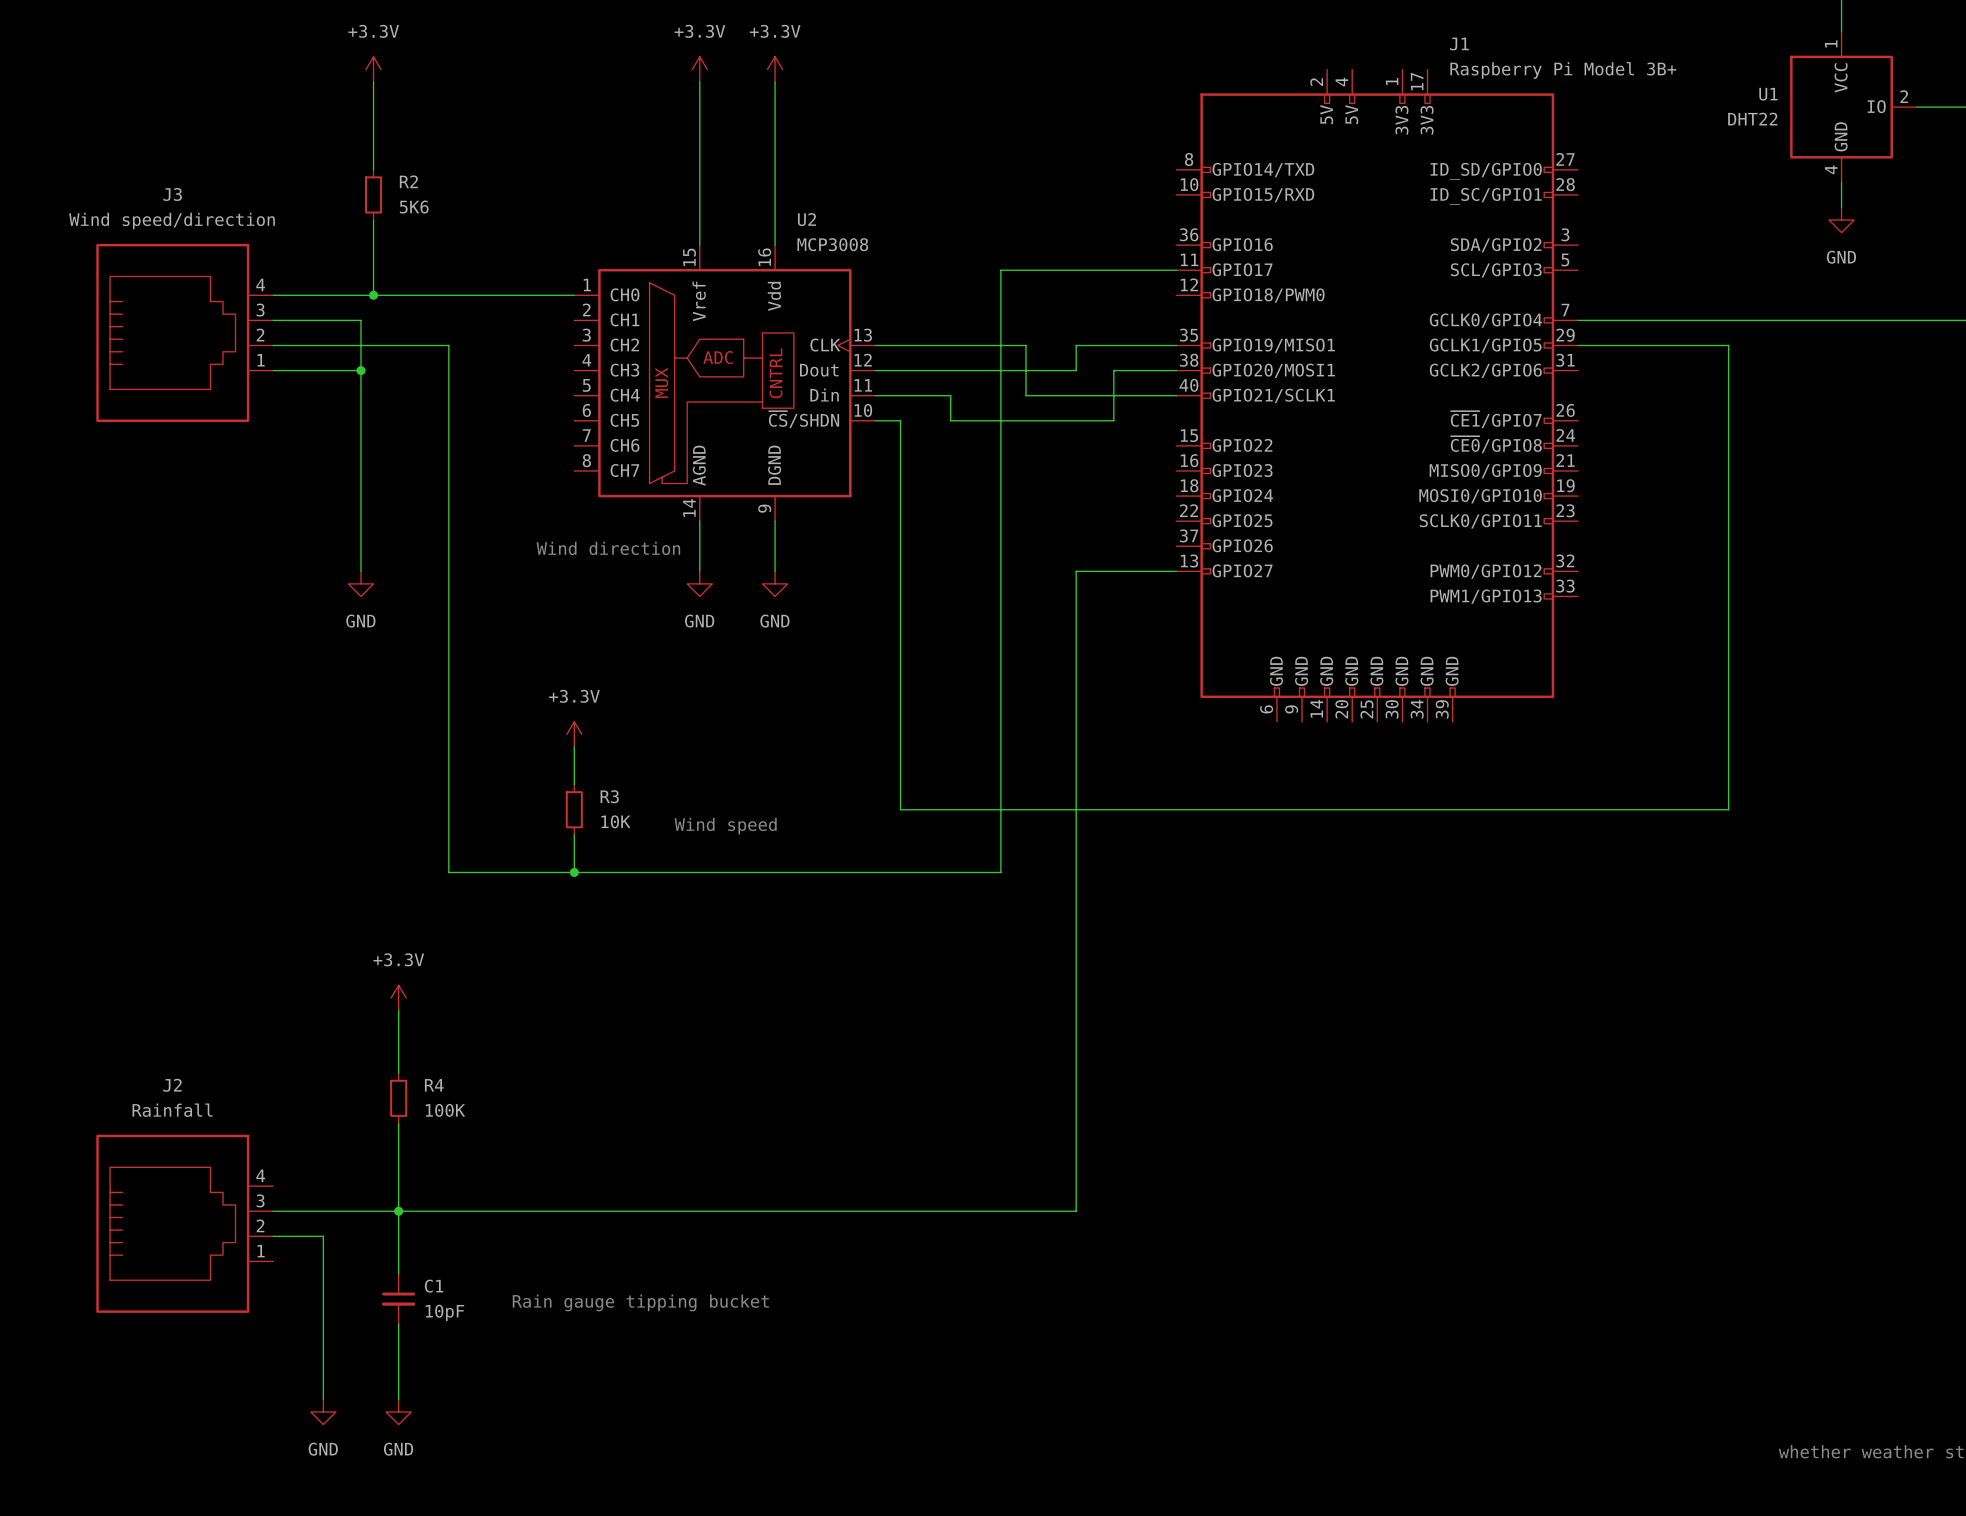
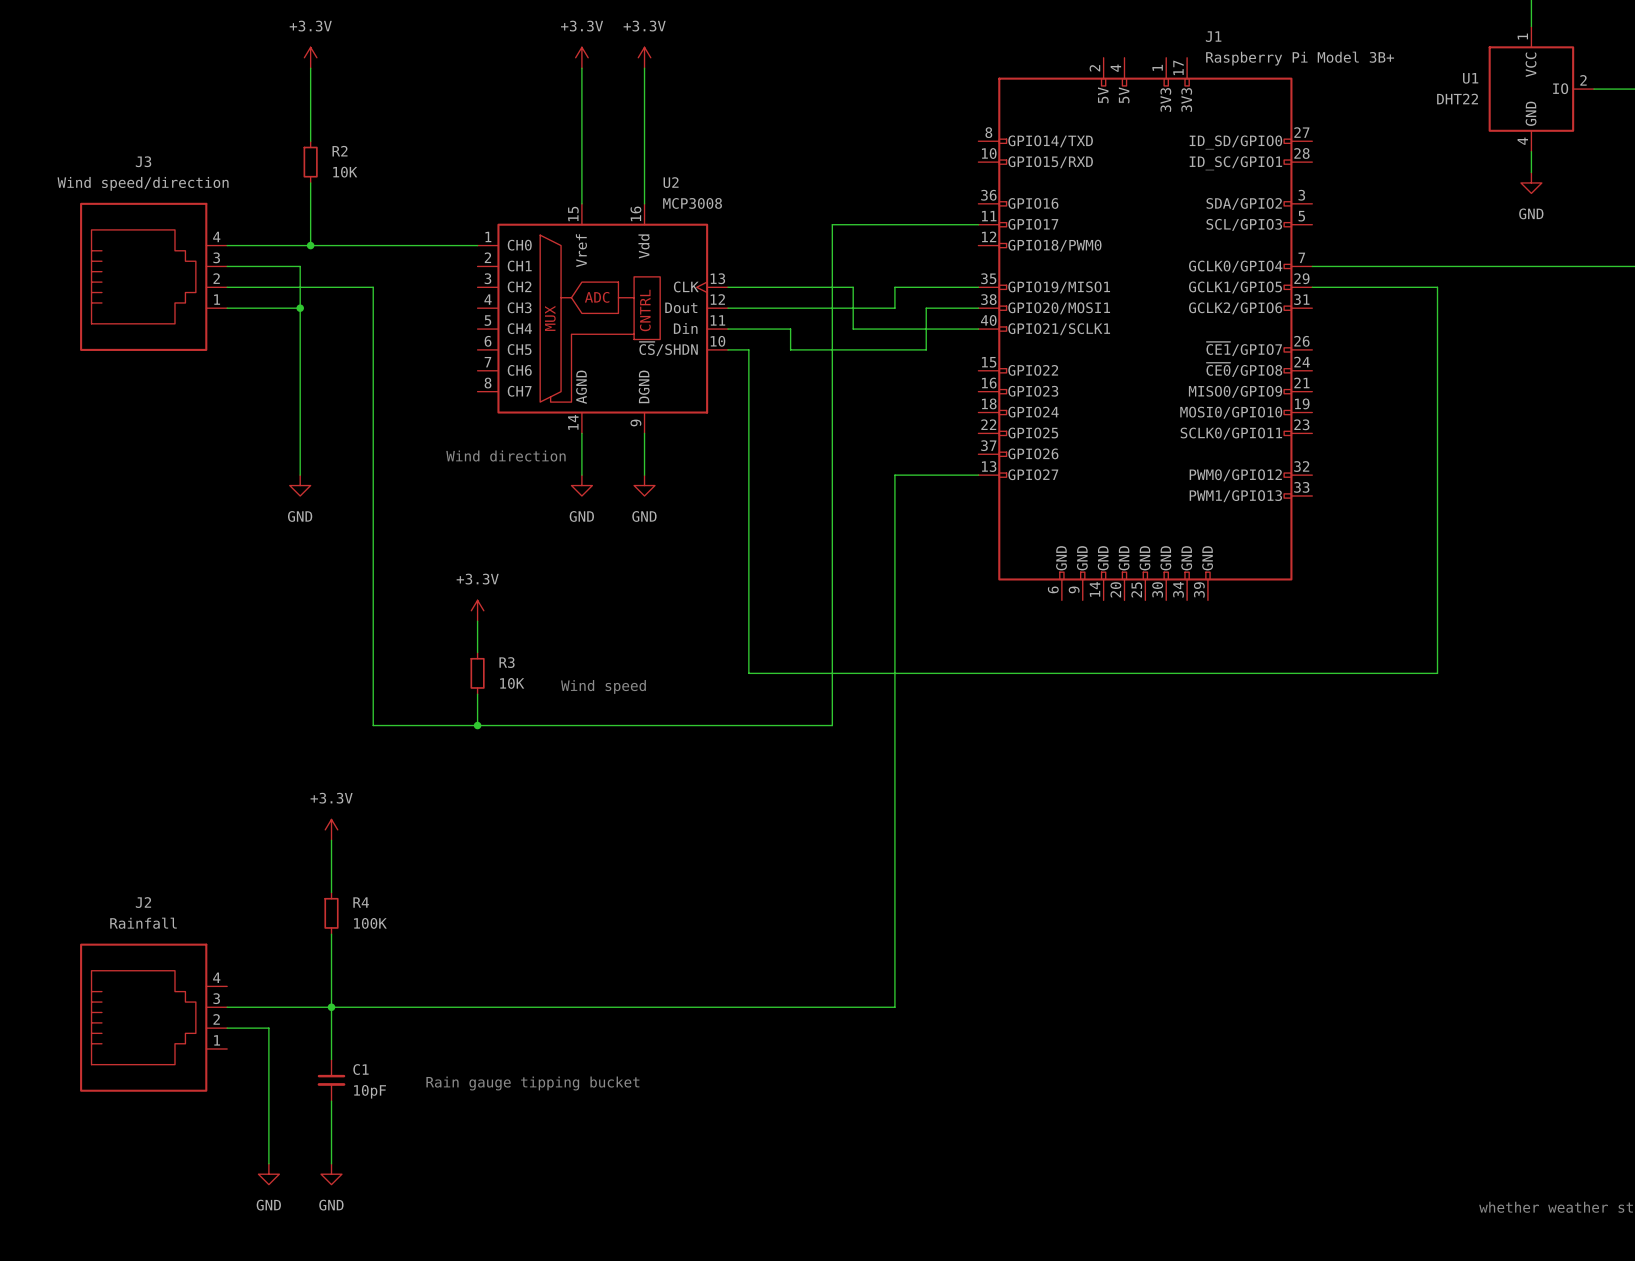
R2 value: 5K6 (414, 207) -> 10K (345, 172)

